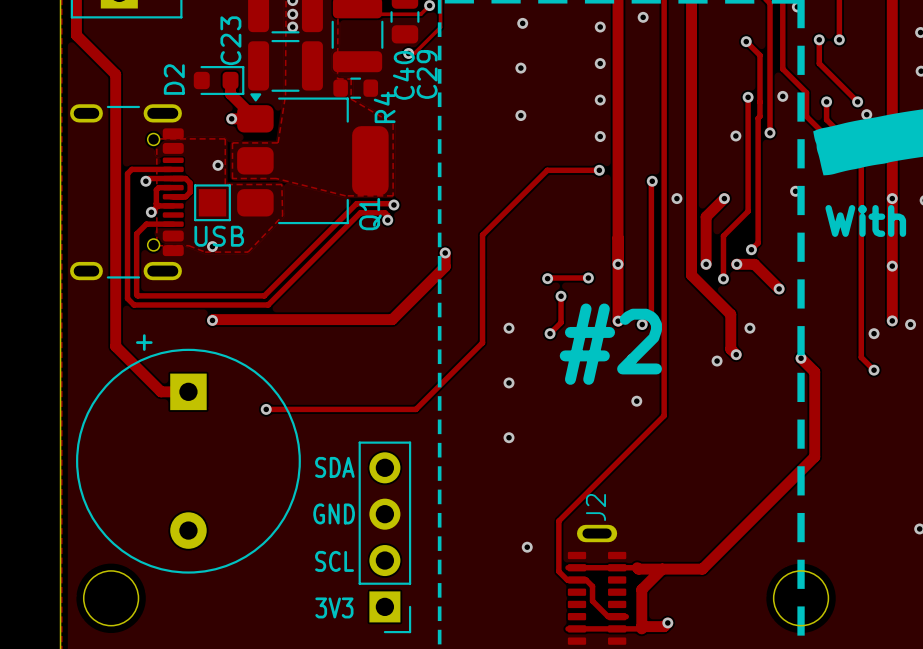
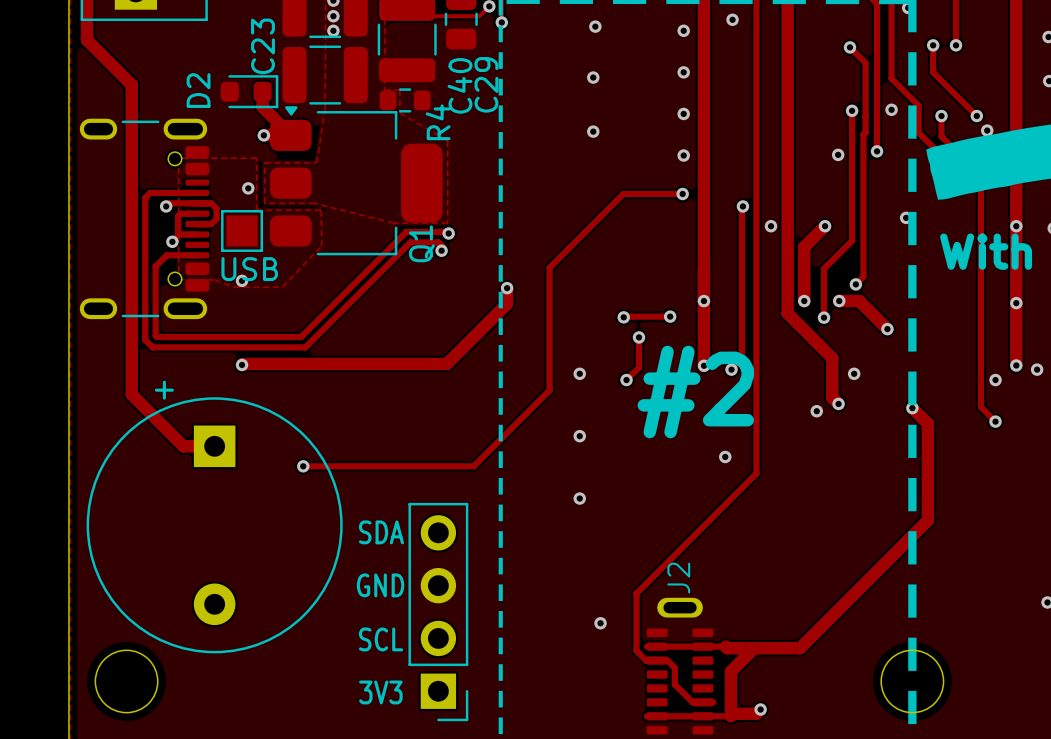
track: (440, 19) (440, 27) (414, 53) (408, 53) -> none
via position: (408, 53) -> (501, 22)

